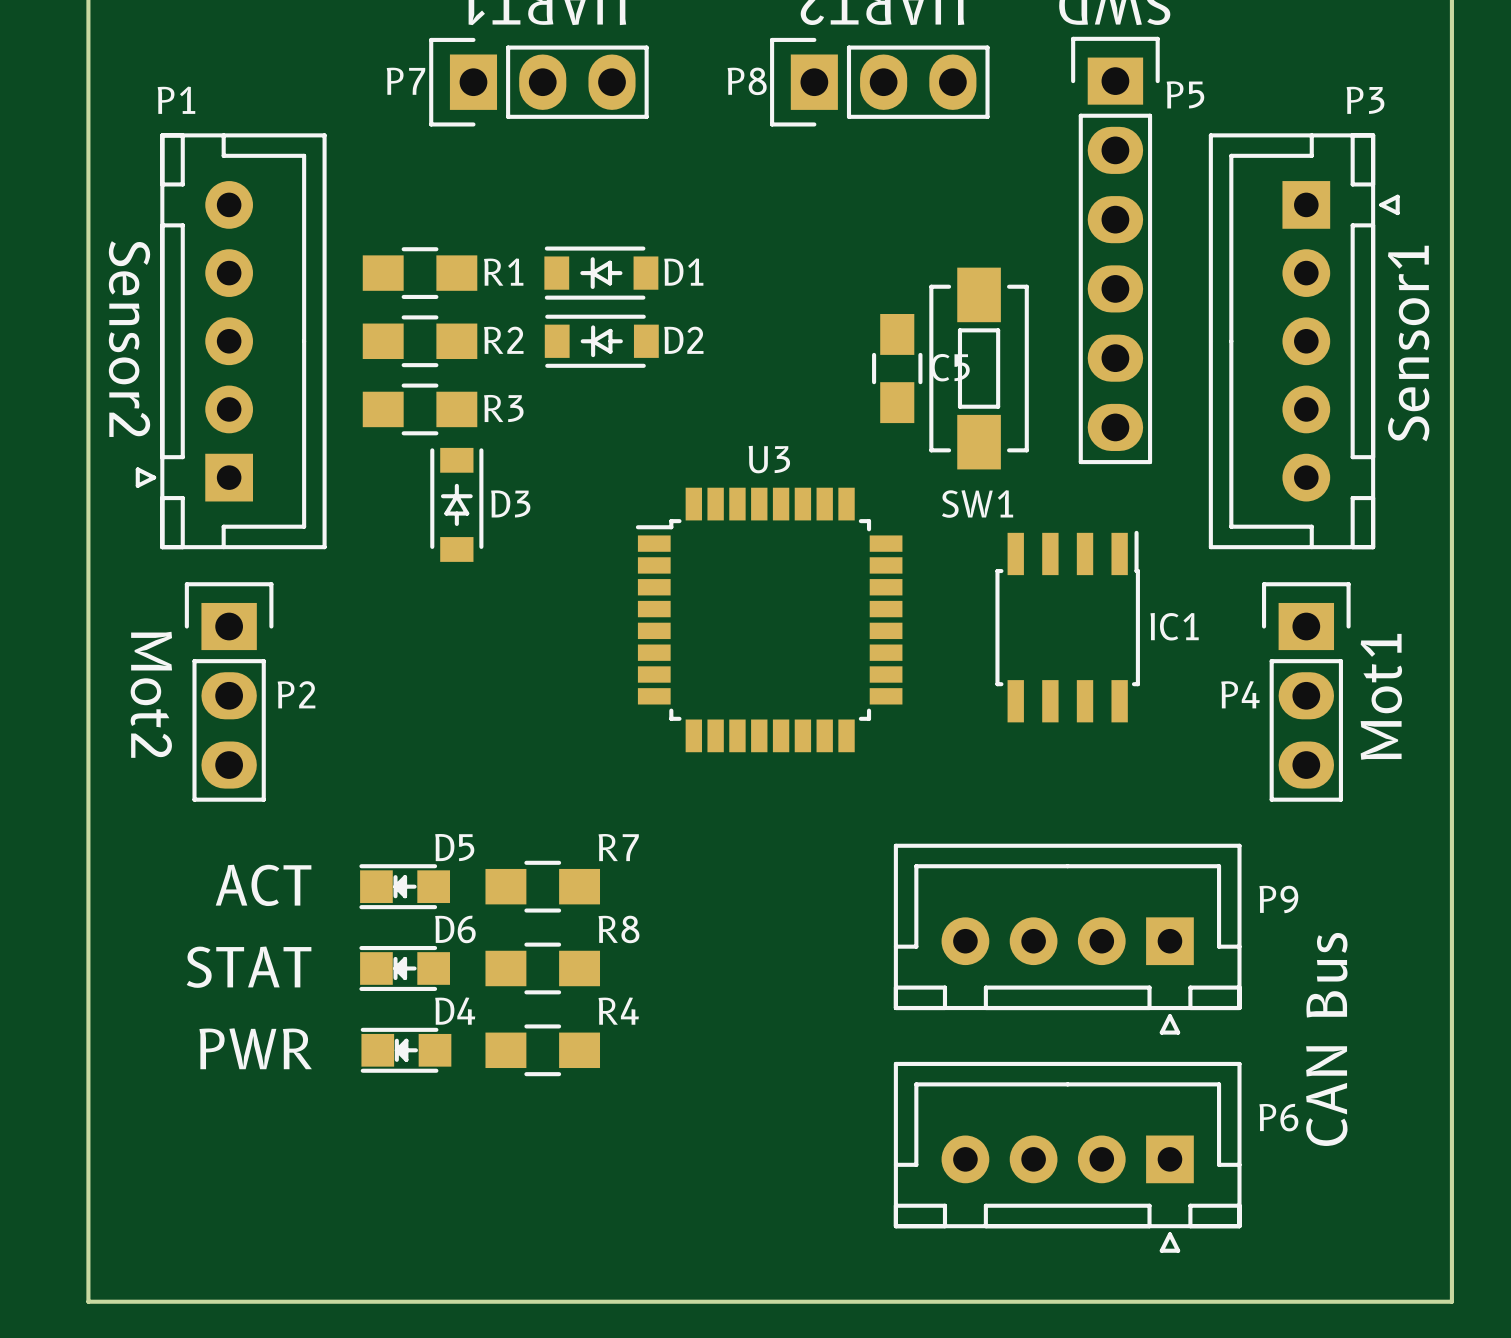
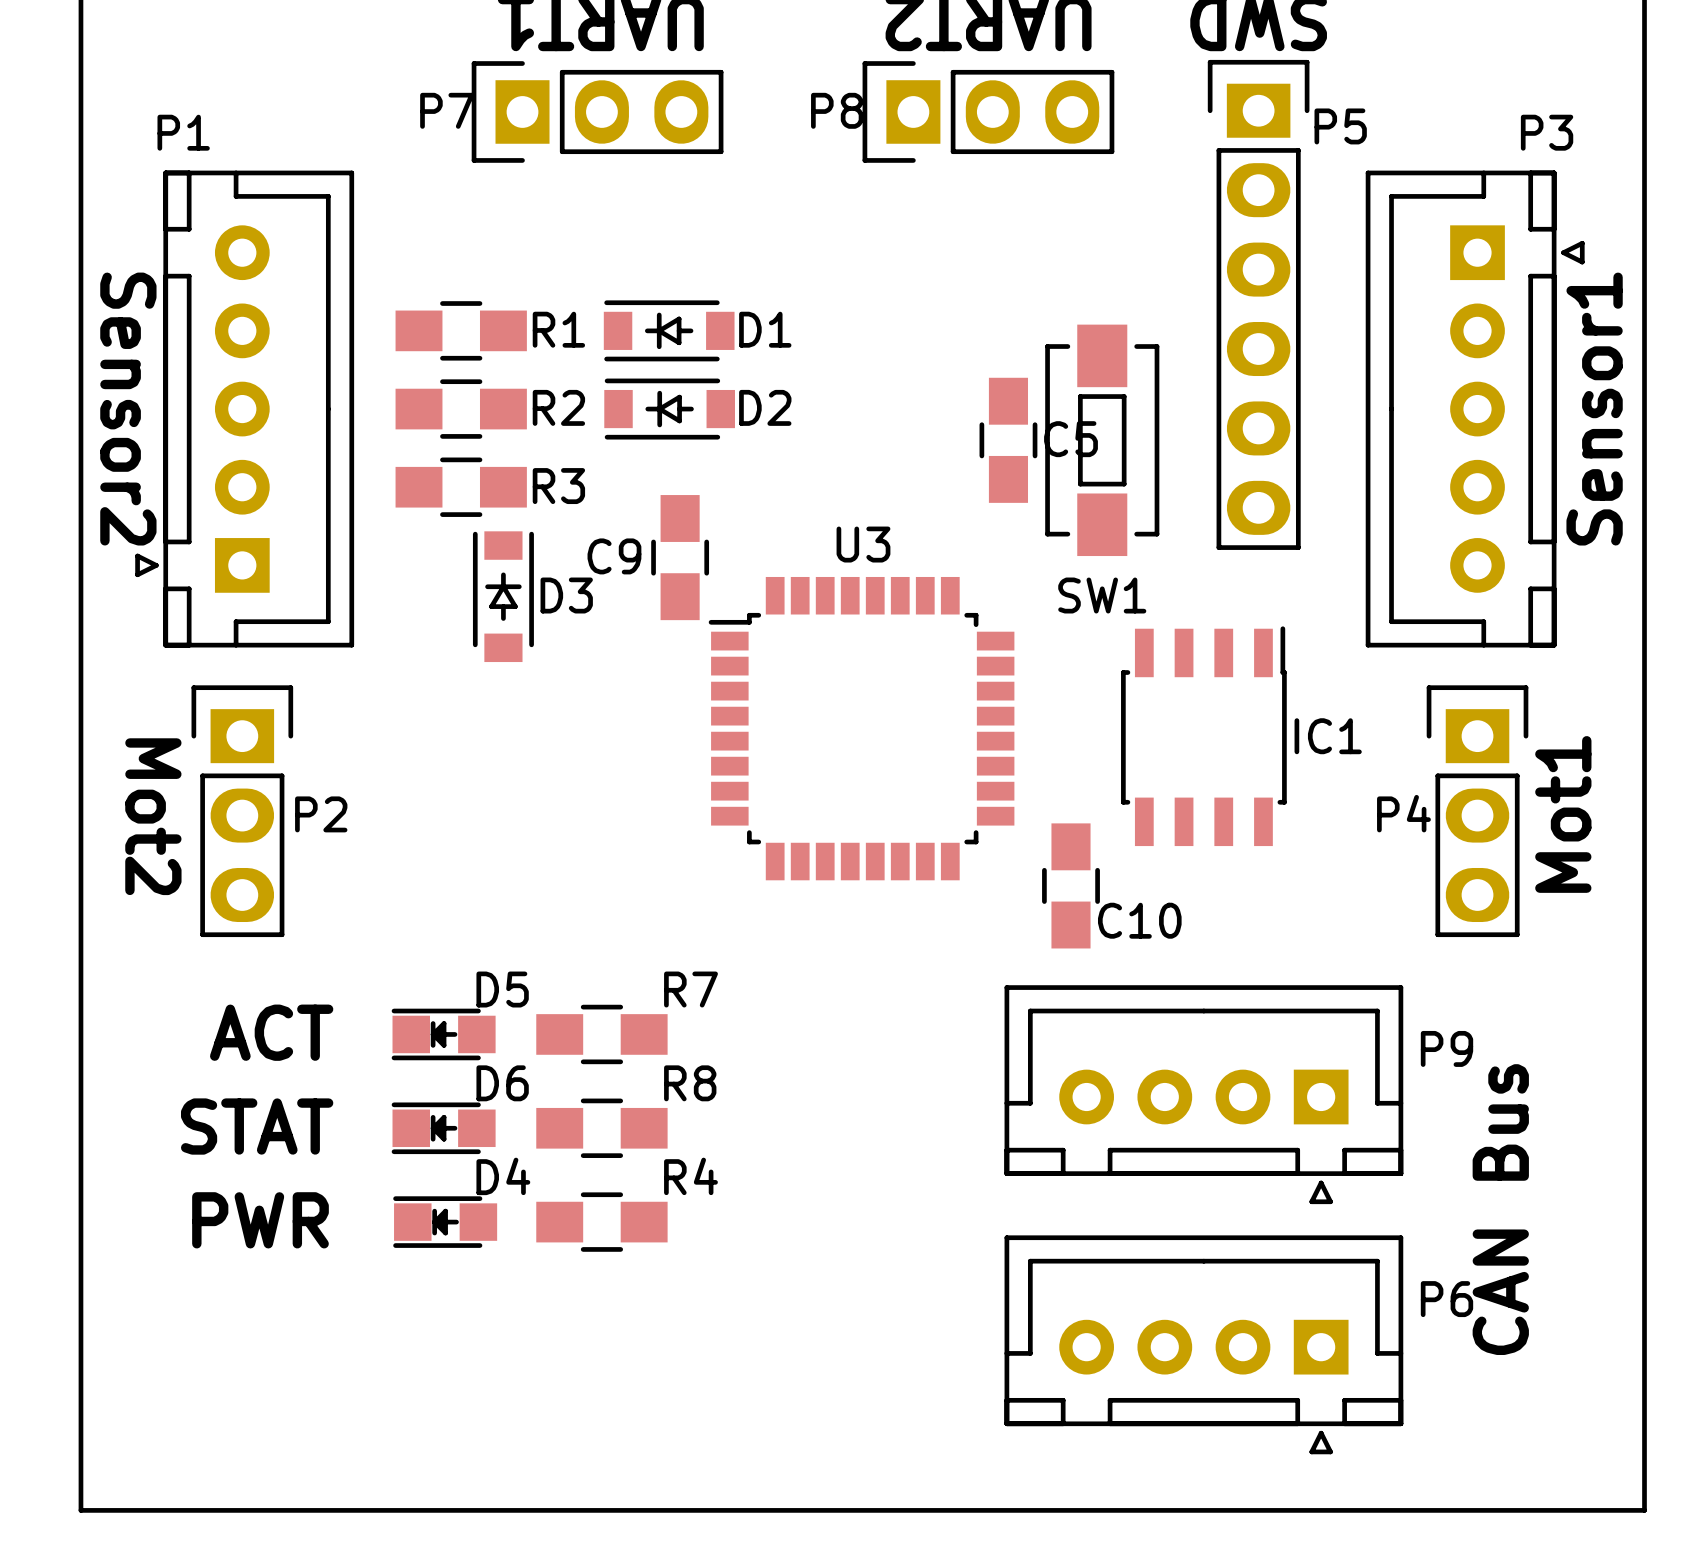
C9: none -> (680, 557)
C10: none -> (1071, 885)

